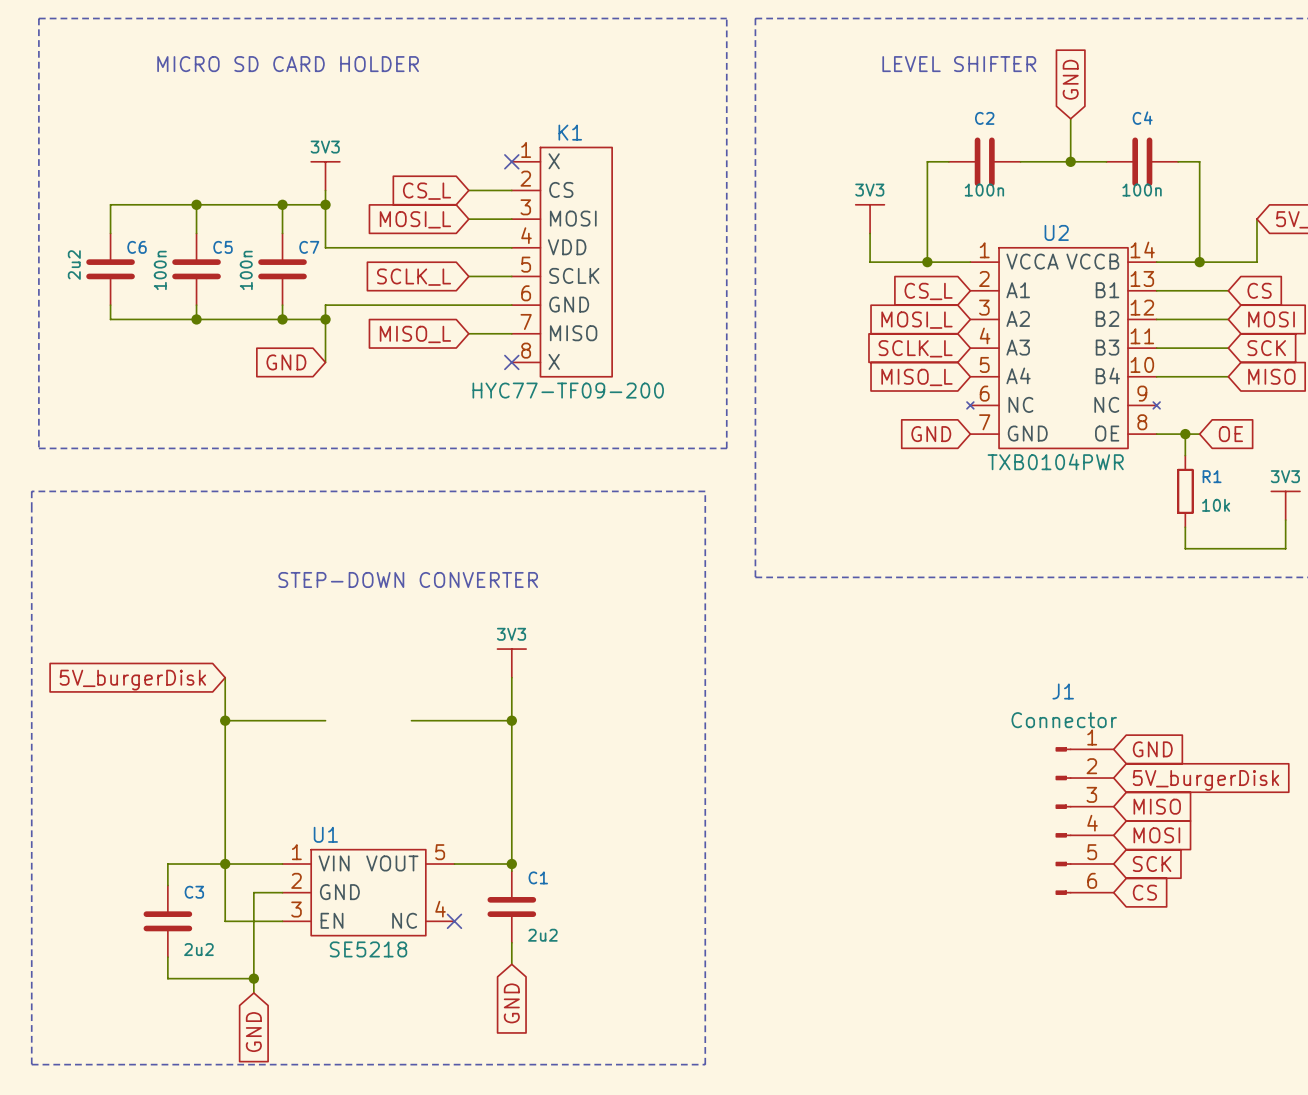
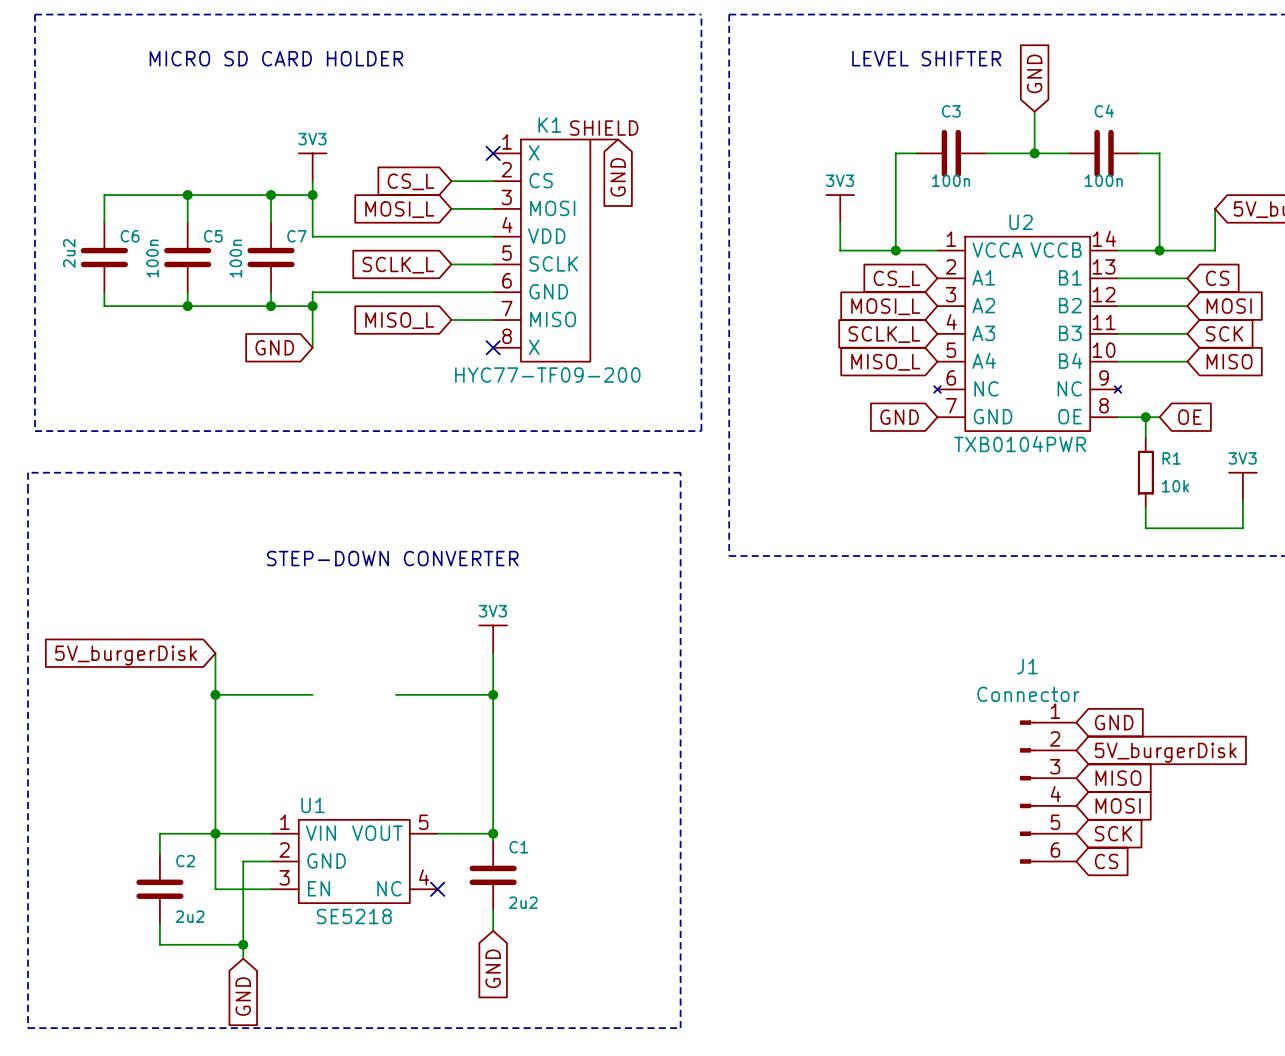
C2 name: C2 (984, 118) -> C3 (951, 111)
K1 symbol: [511, 146, 613, 378] -> [493, 138, 619, 363]
global label: none -> GND (618, 177)
C3 name: C3 (194, 892) -> C2 (185, 861)

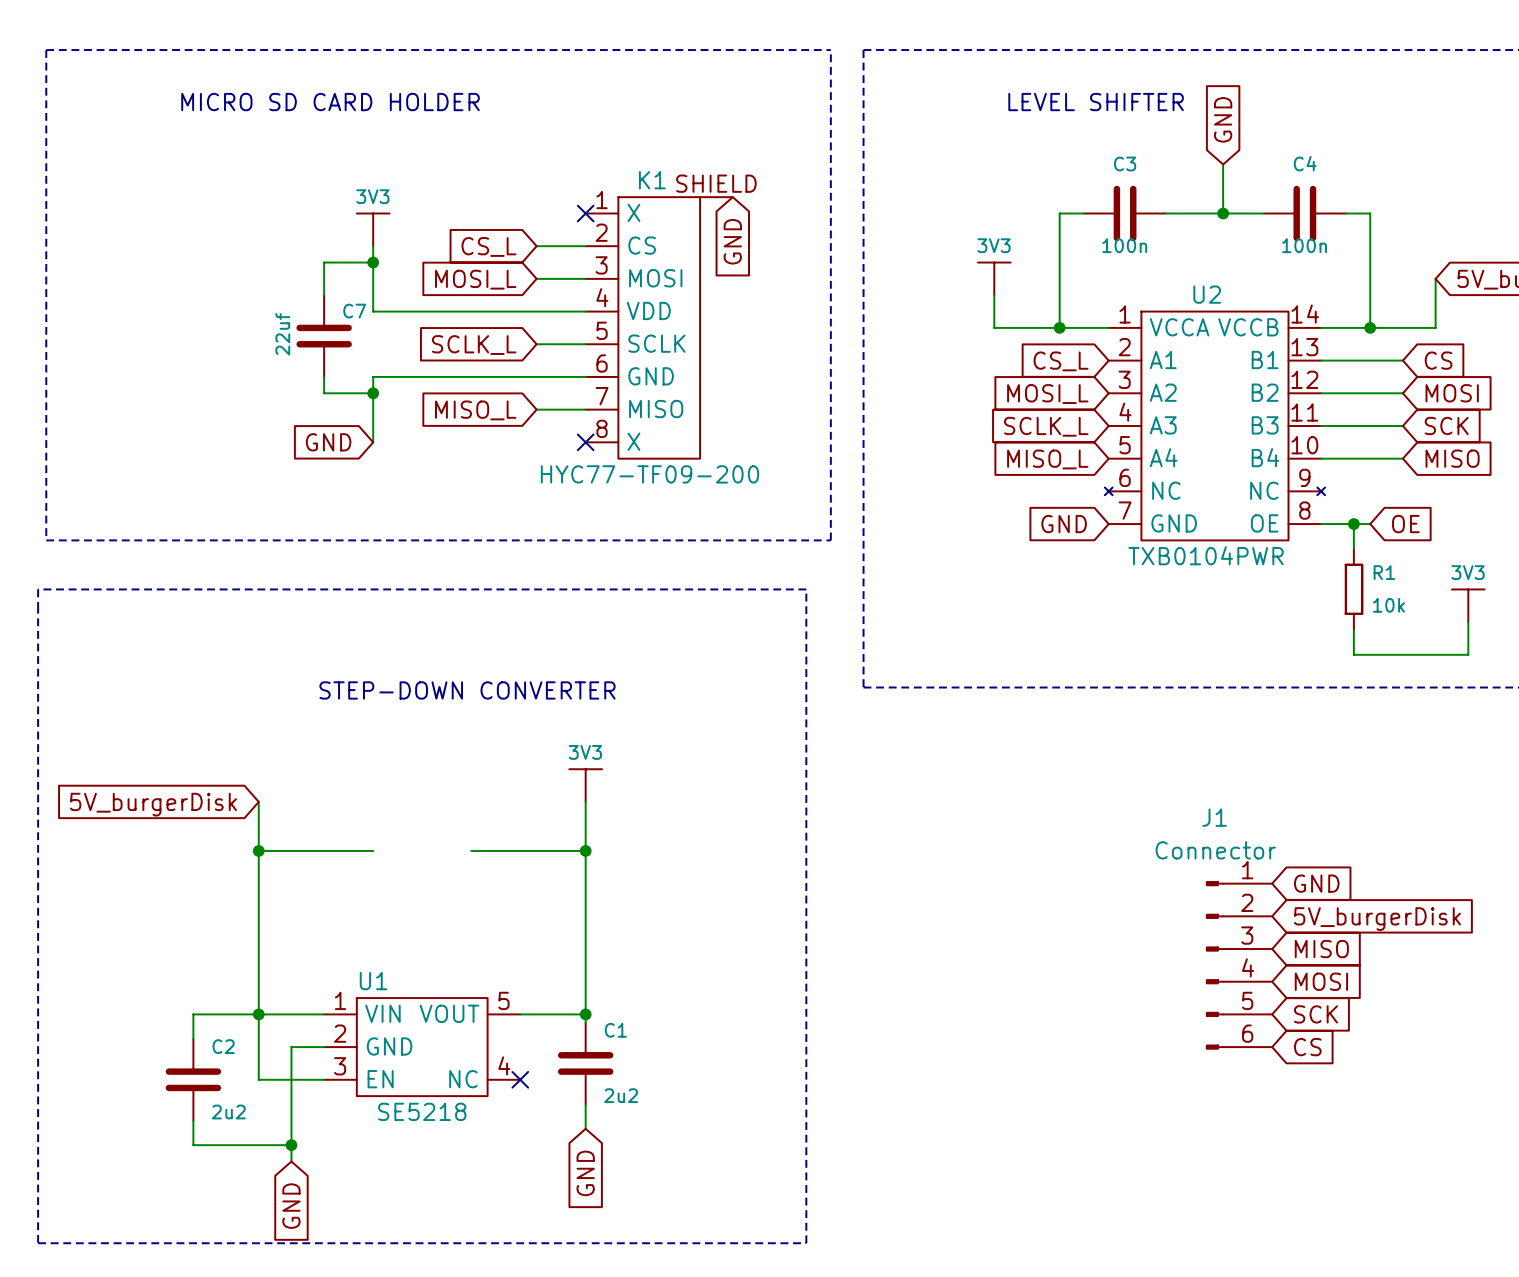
wire: (187, 195) (187, 222) -> none
junction: (187, 195) -> none
wire: (271, 195) (104, 195) (104, 222) -> none
junction: (271, 195) -> none
C6: 2u2 (104, 257) -> none
C5: 100n (187, 257) -> none
C7 value: 100n (235, 258) -> 22uf (282, 334)
wire: (104, 292) (104, 306) (271, 306) -> none
wire: (187, 292) (187, 306) -> none
junction: (187, 306) -> none
junction: (271, 306) -> none

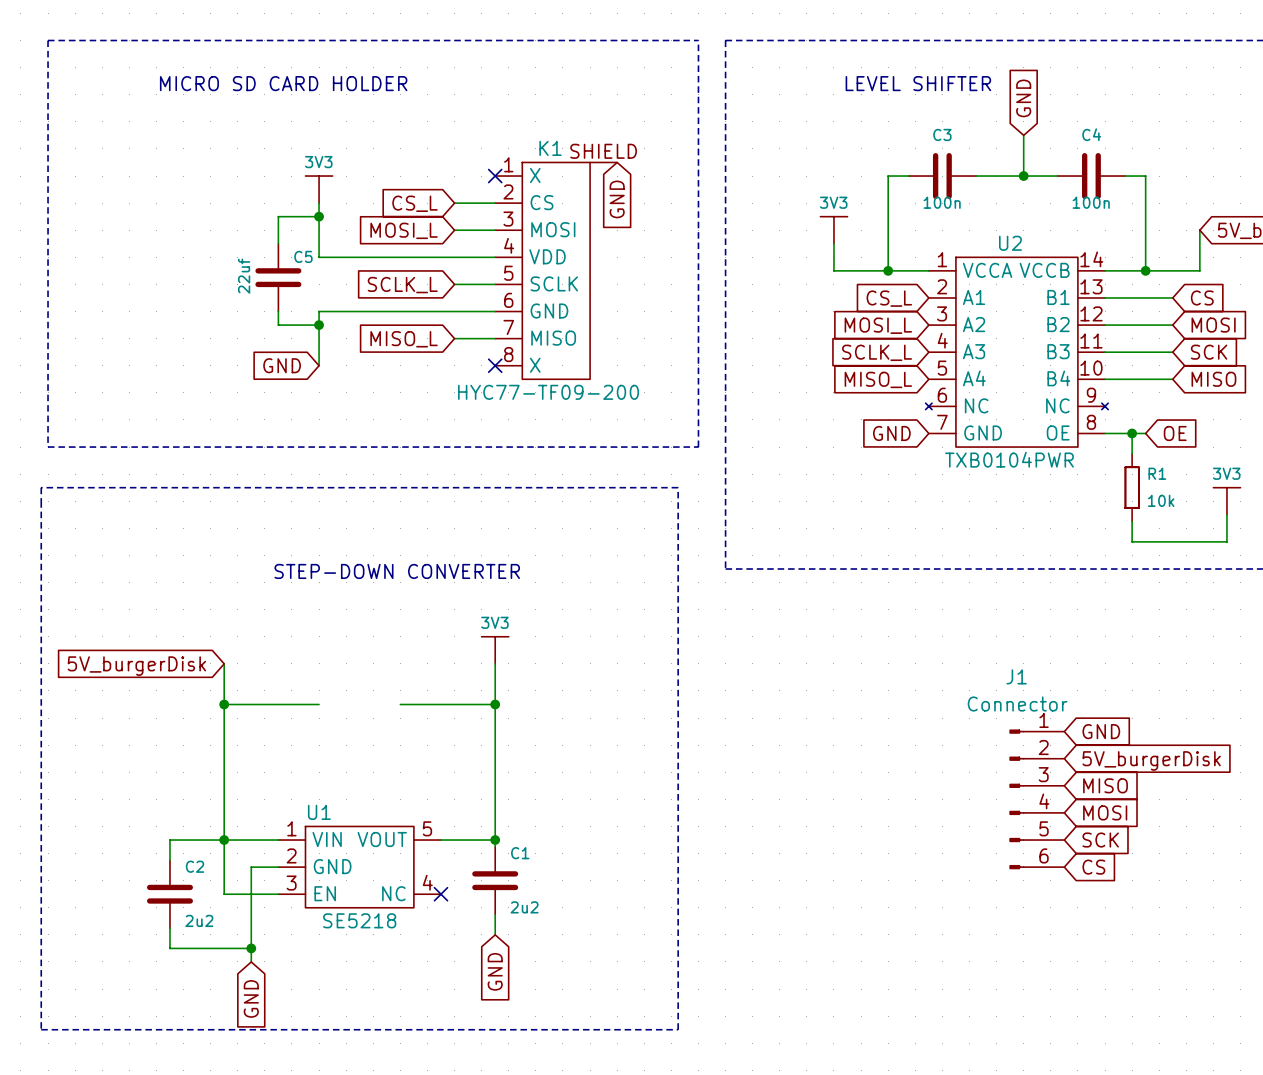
C7 name: C7 (354, 311) -> C5 (303, 256)

